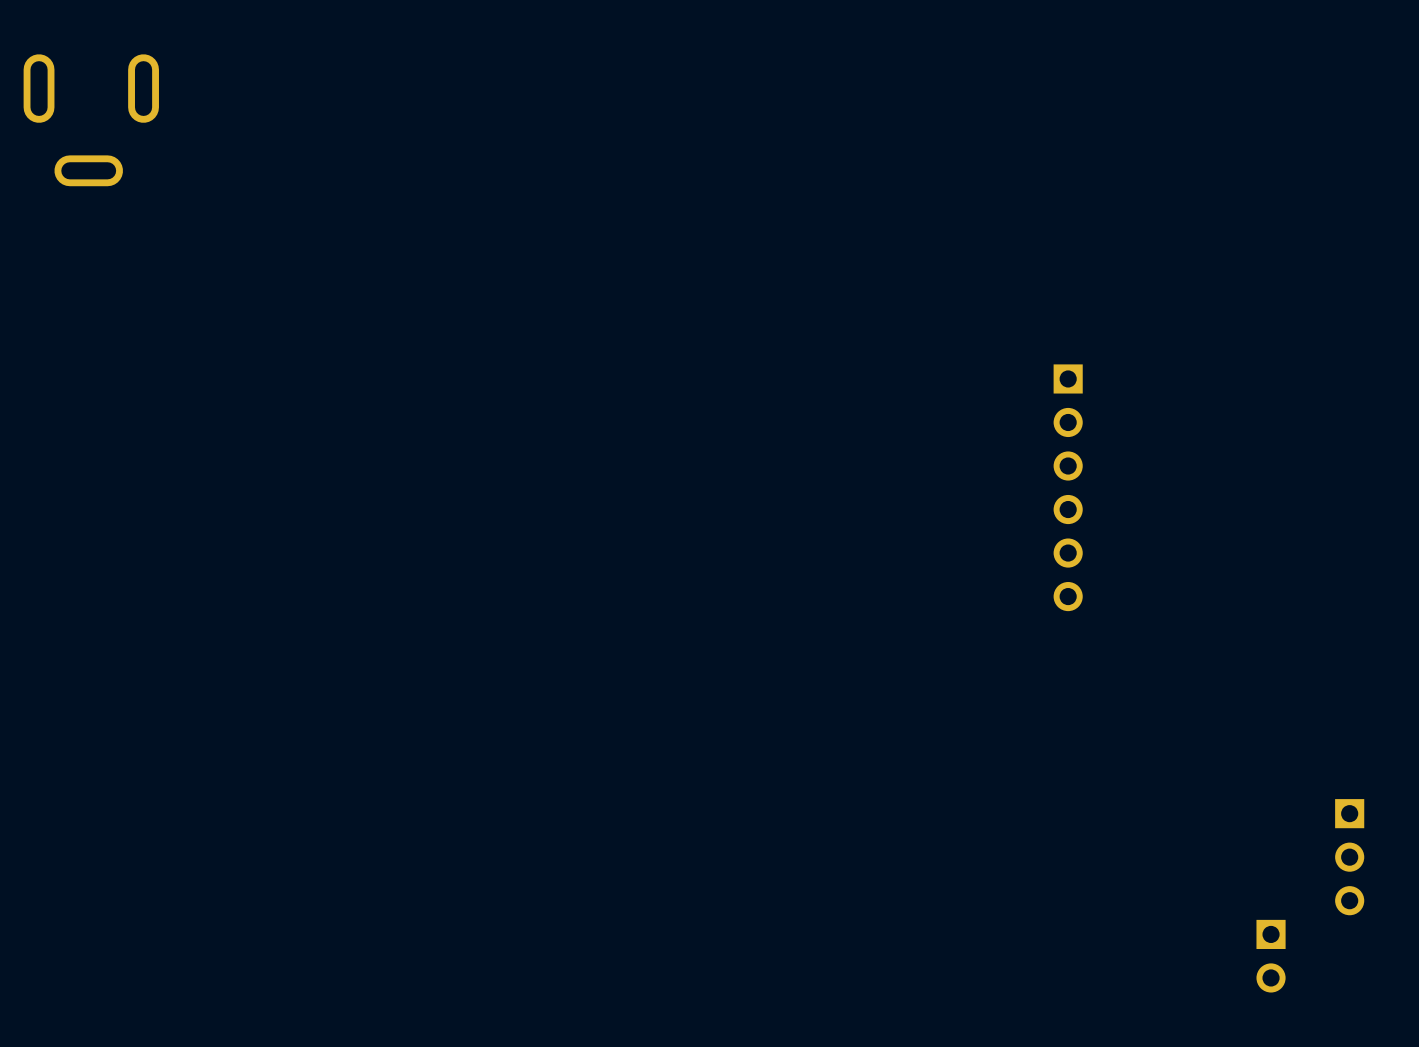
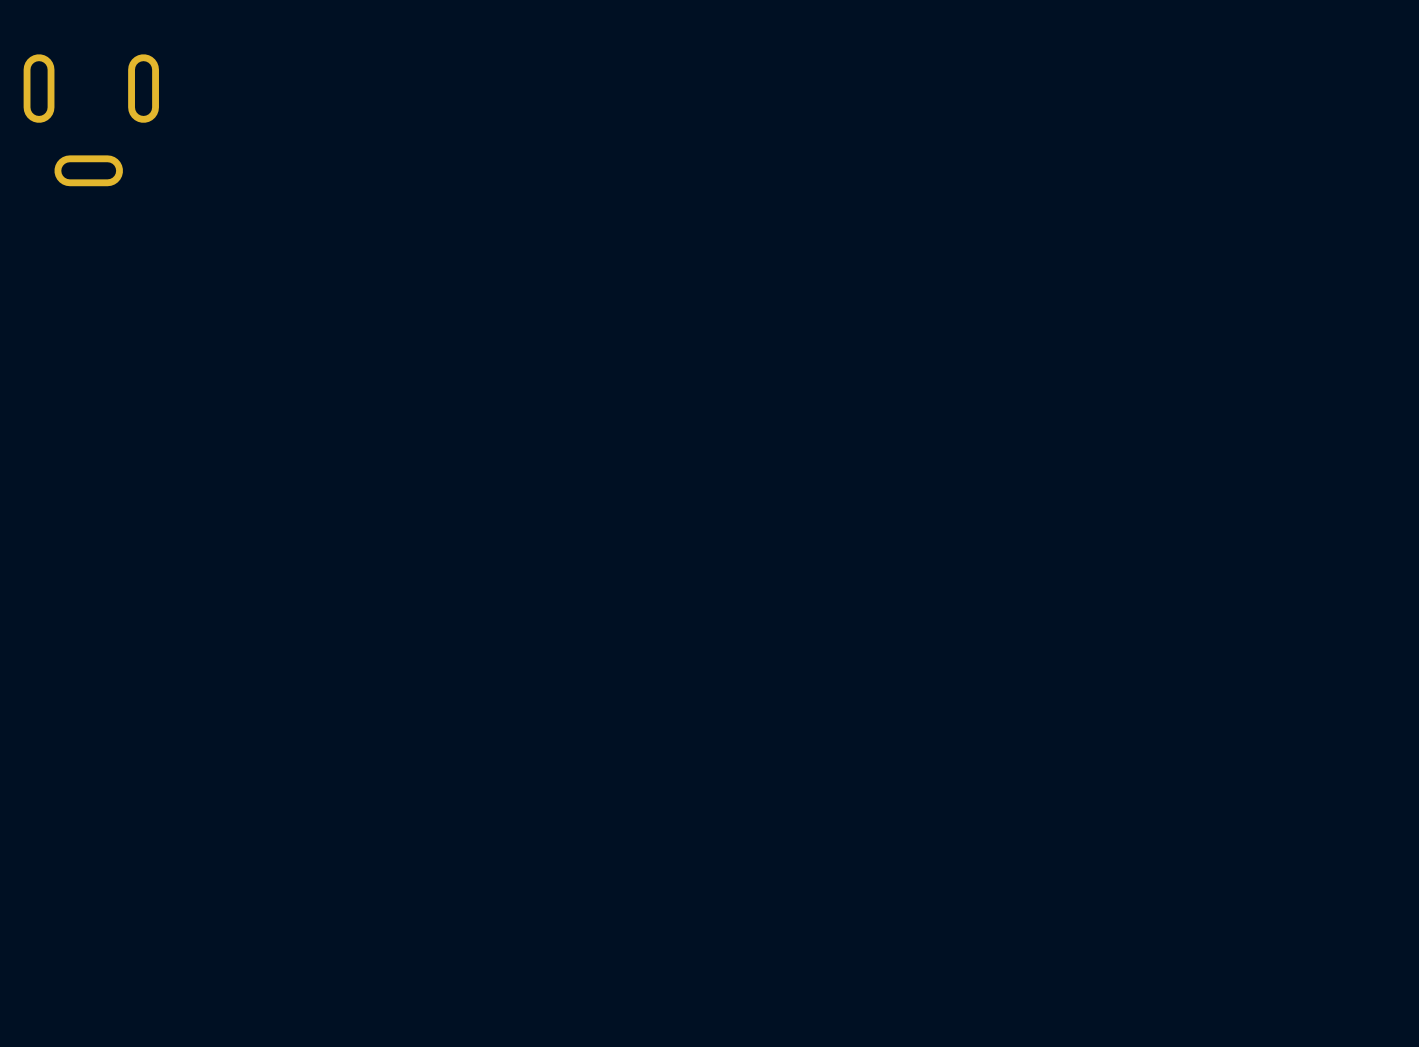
part: (1068, 487) -> none
part: (1349, 857) -> none
part: (1271, 956) -> none

